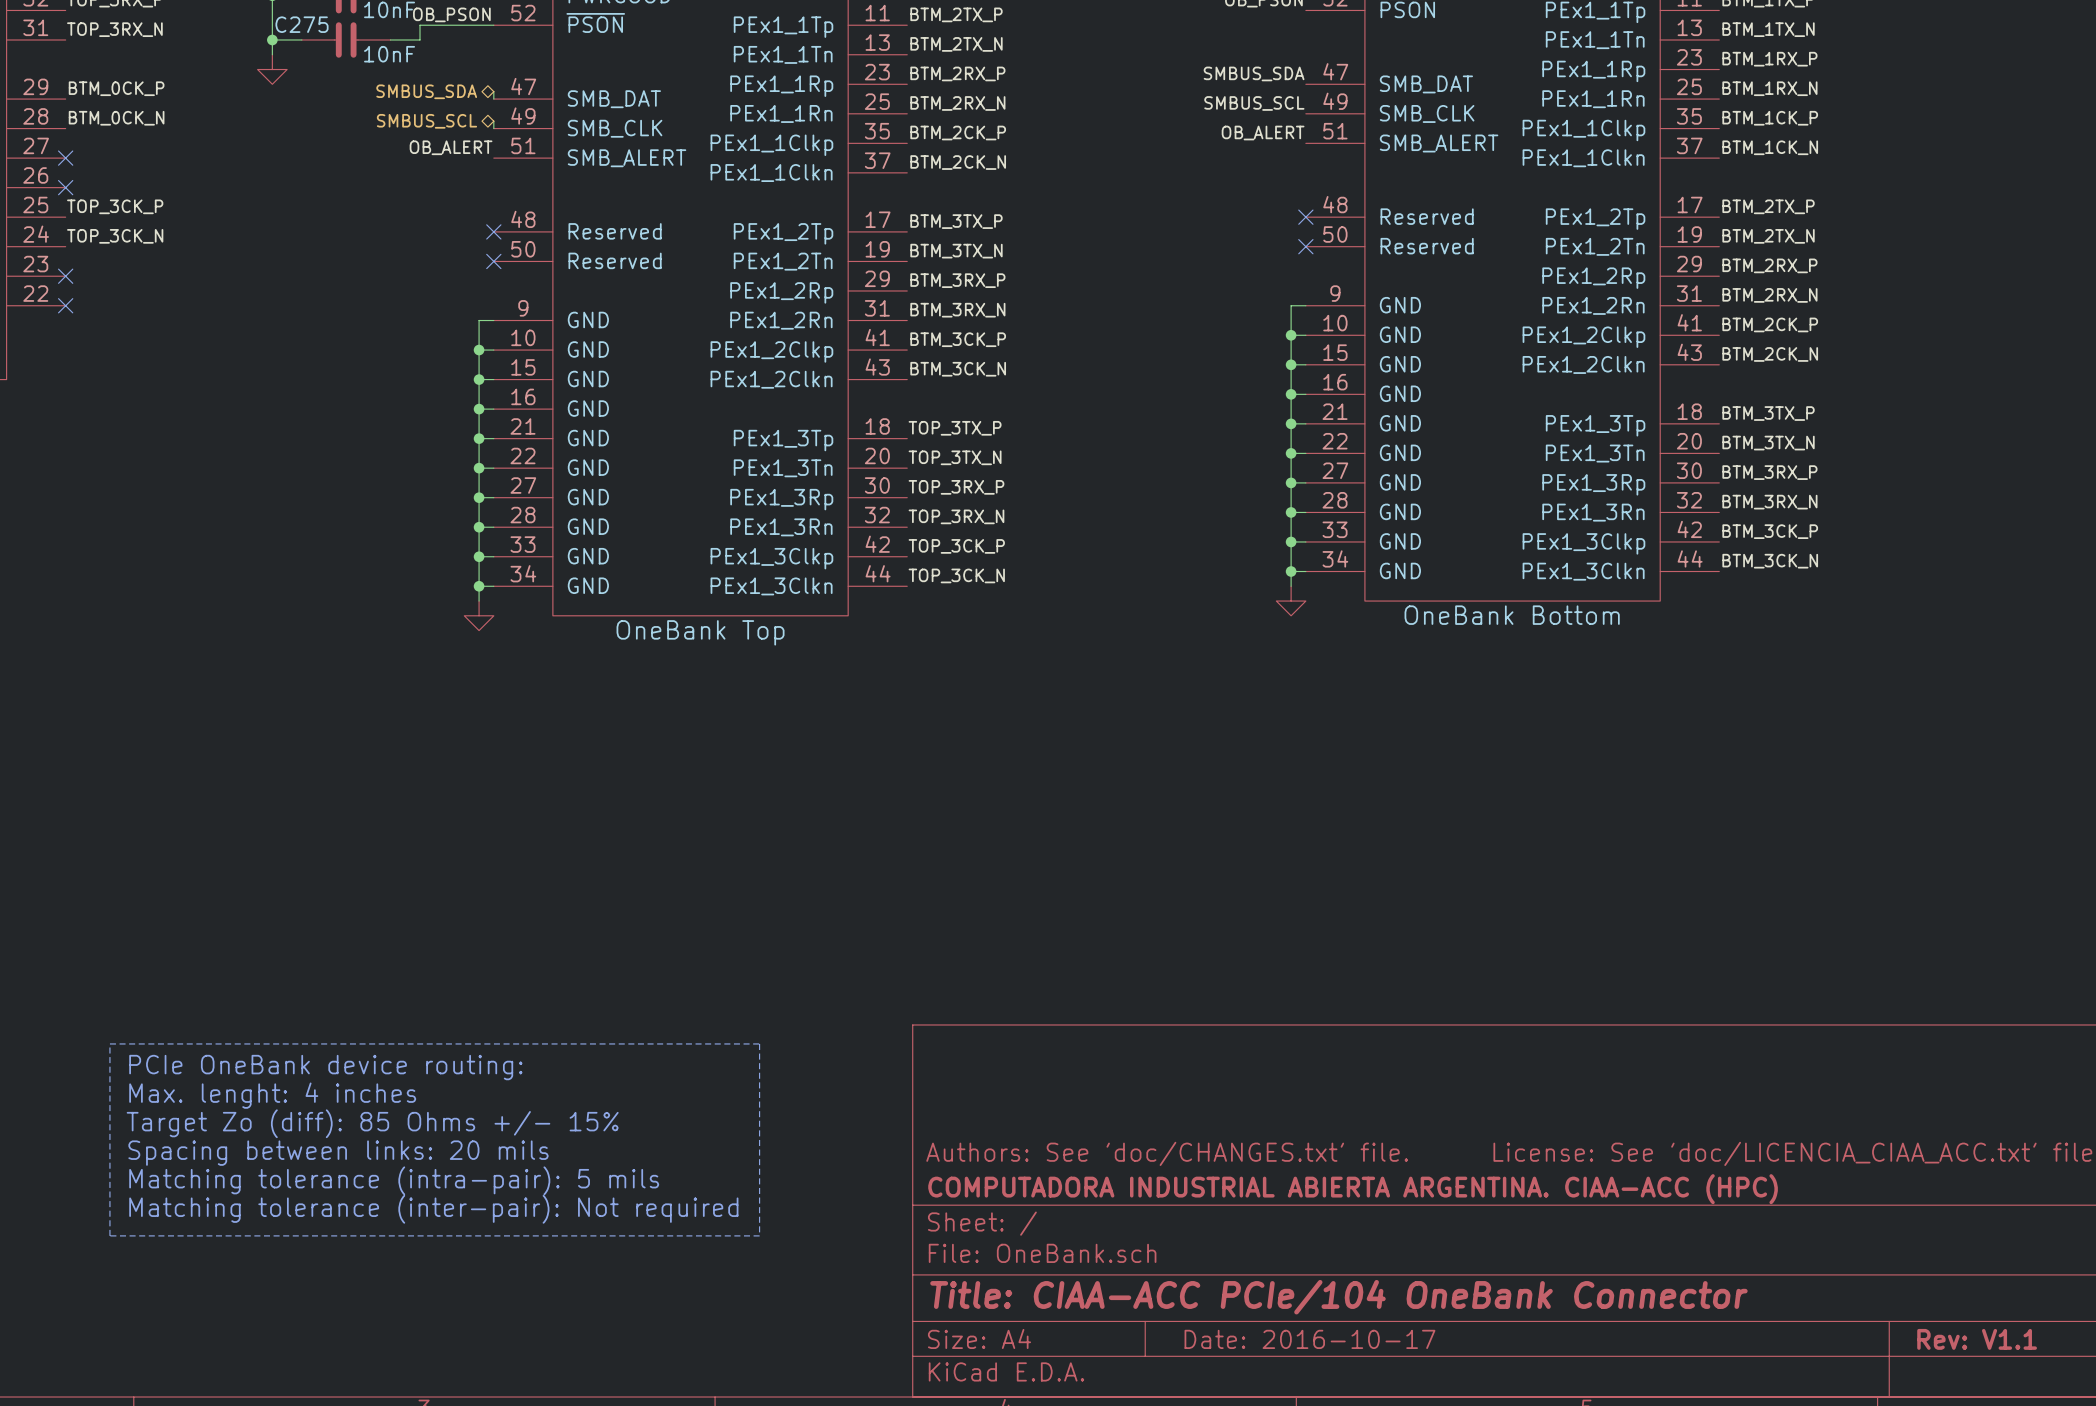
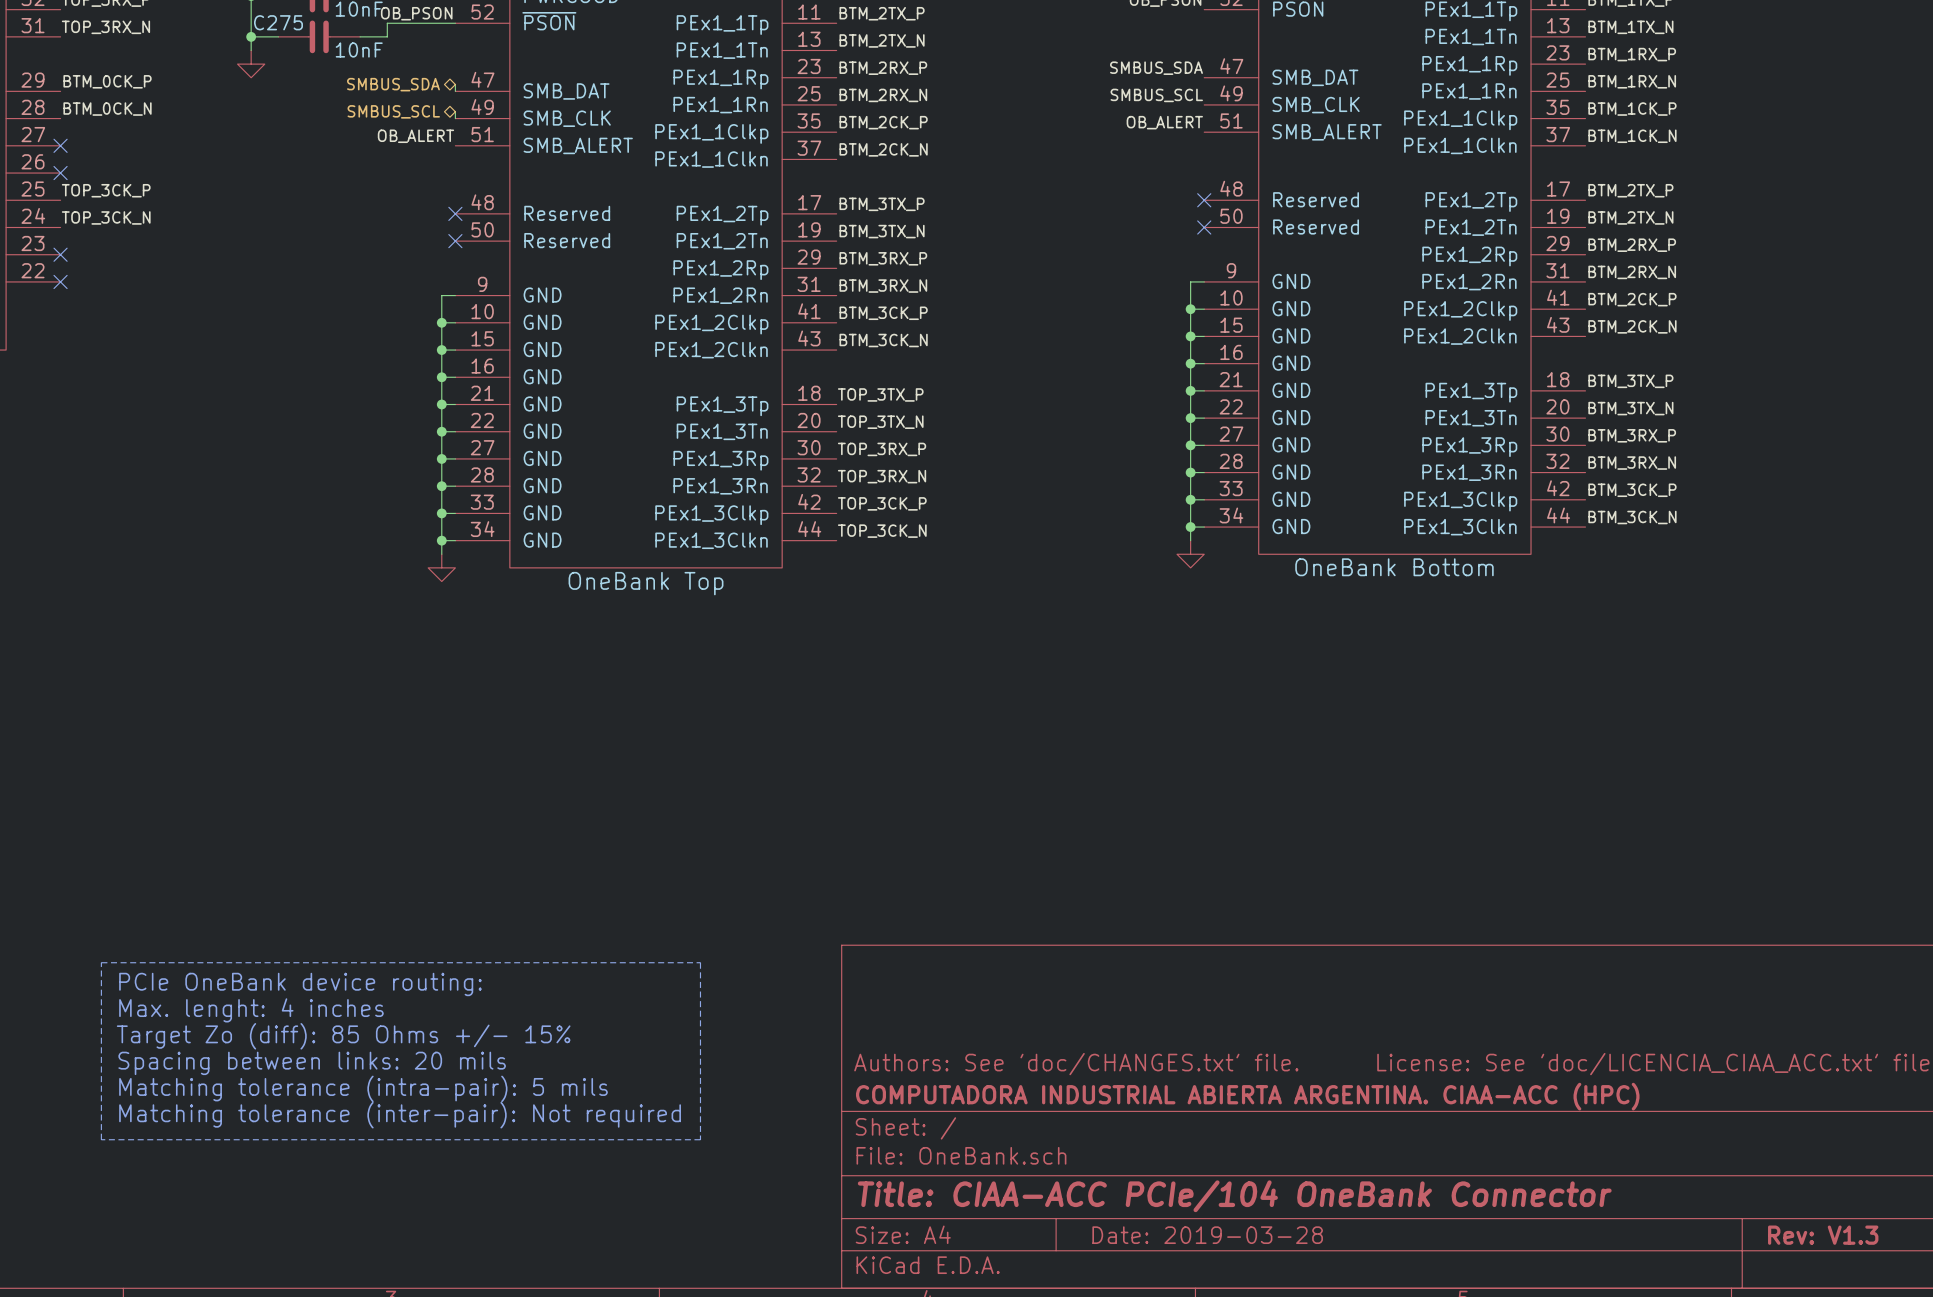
title block: Date: 2016-10-17 (1309, 1339) -> Date: 2019-03-28 (1207, 1235)
title block: Rev: V1.1 (1977, 1339) -> Rev: V1.3 (1823, 1235)

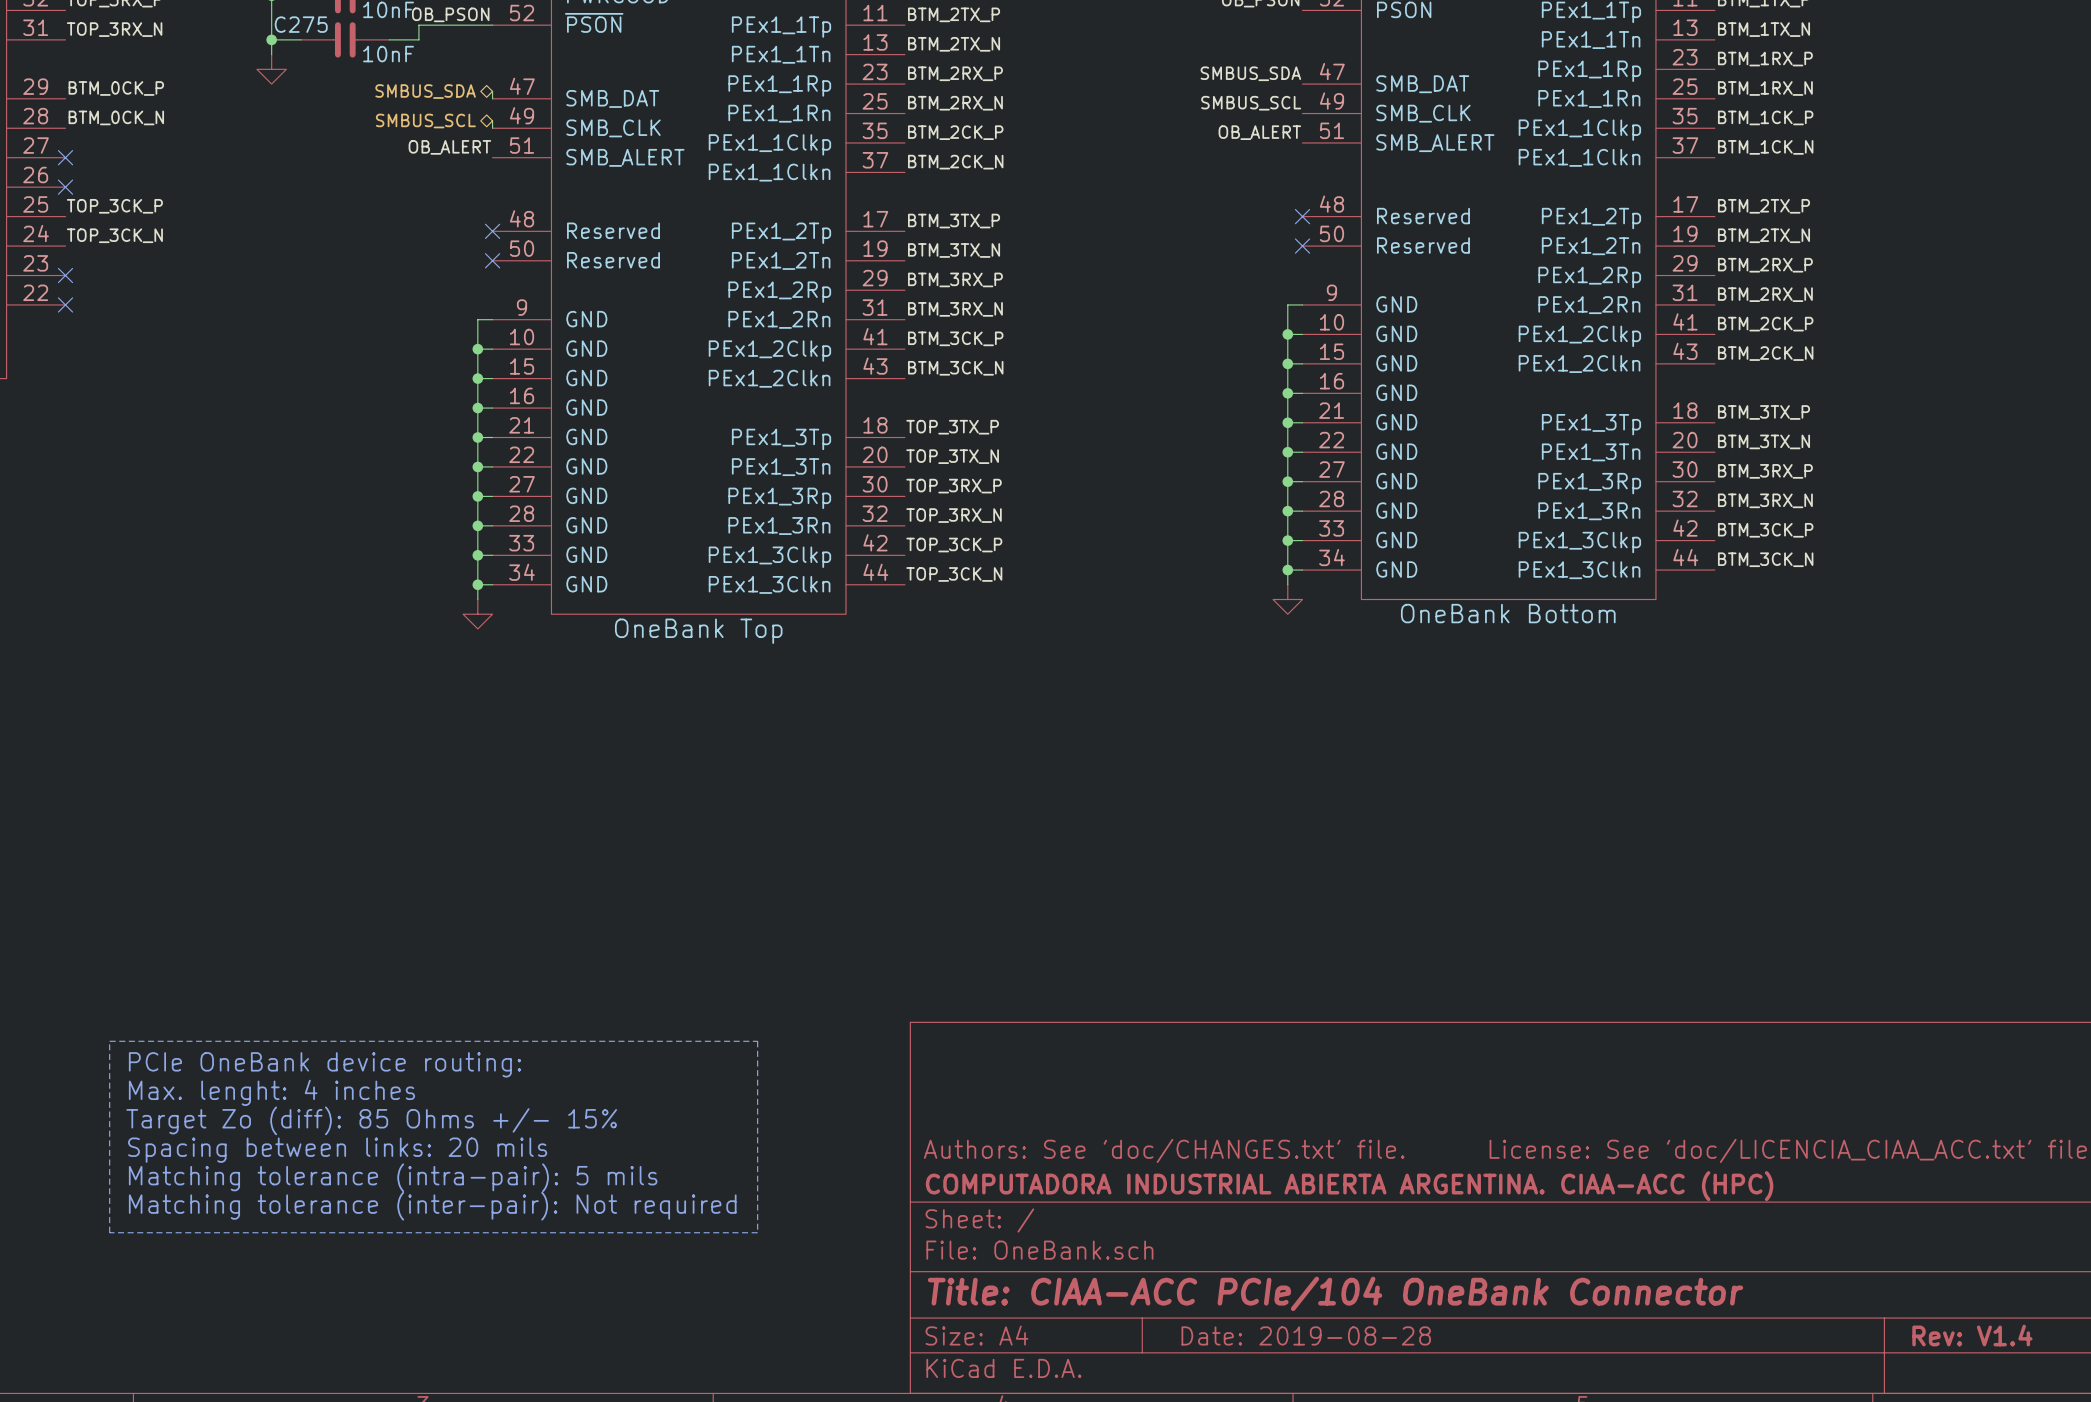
title block: Date: 2019-03-28 (1207, 1235) -> Date: 2019-08-28 (1306, 1335)
title block: Rev: V1.3 (1823, 1235) -> Rev: V1.4 (1972, 1335)

